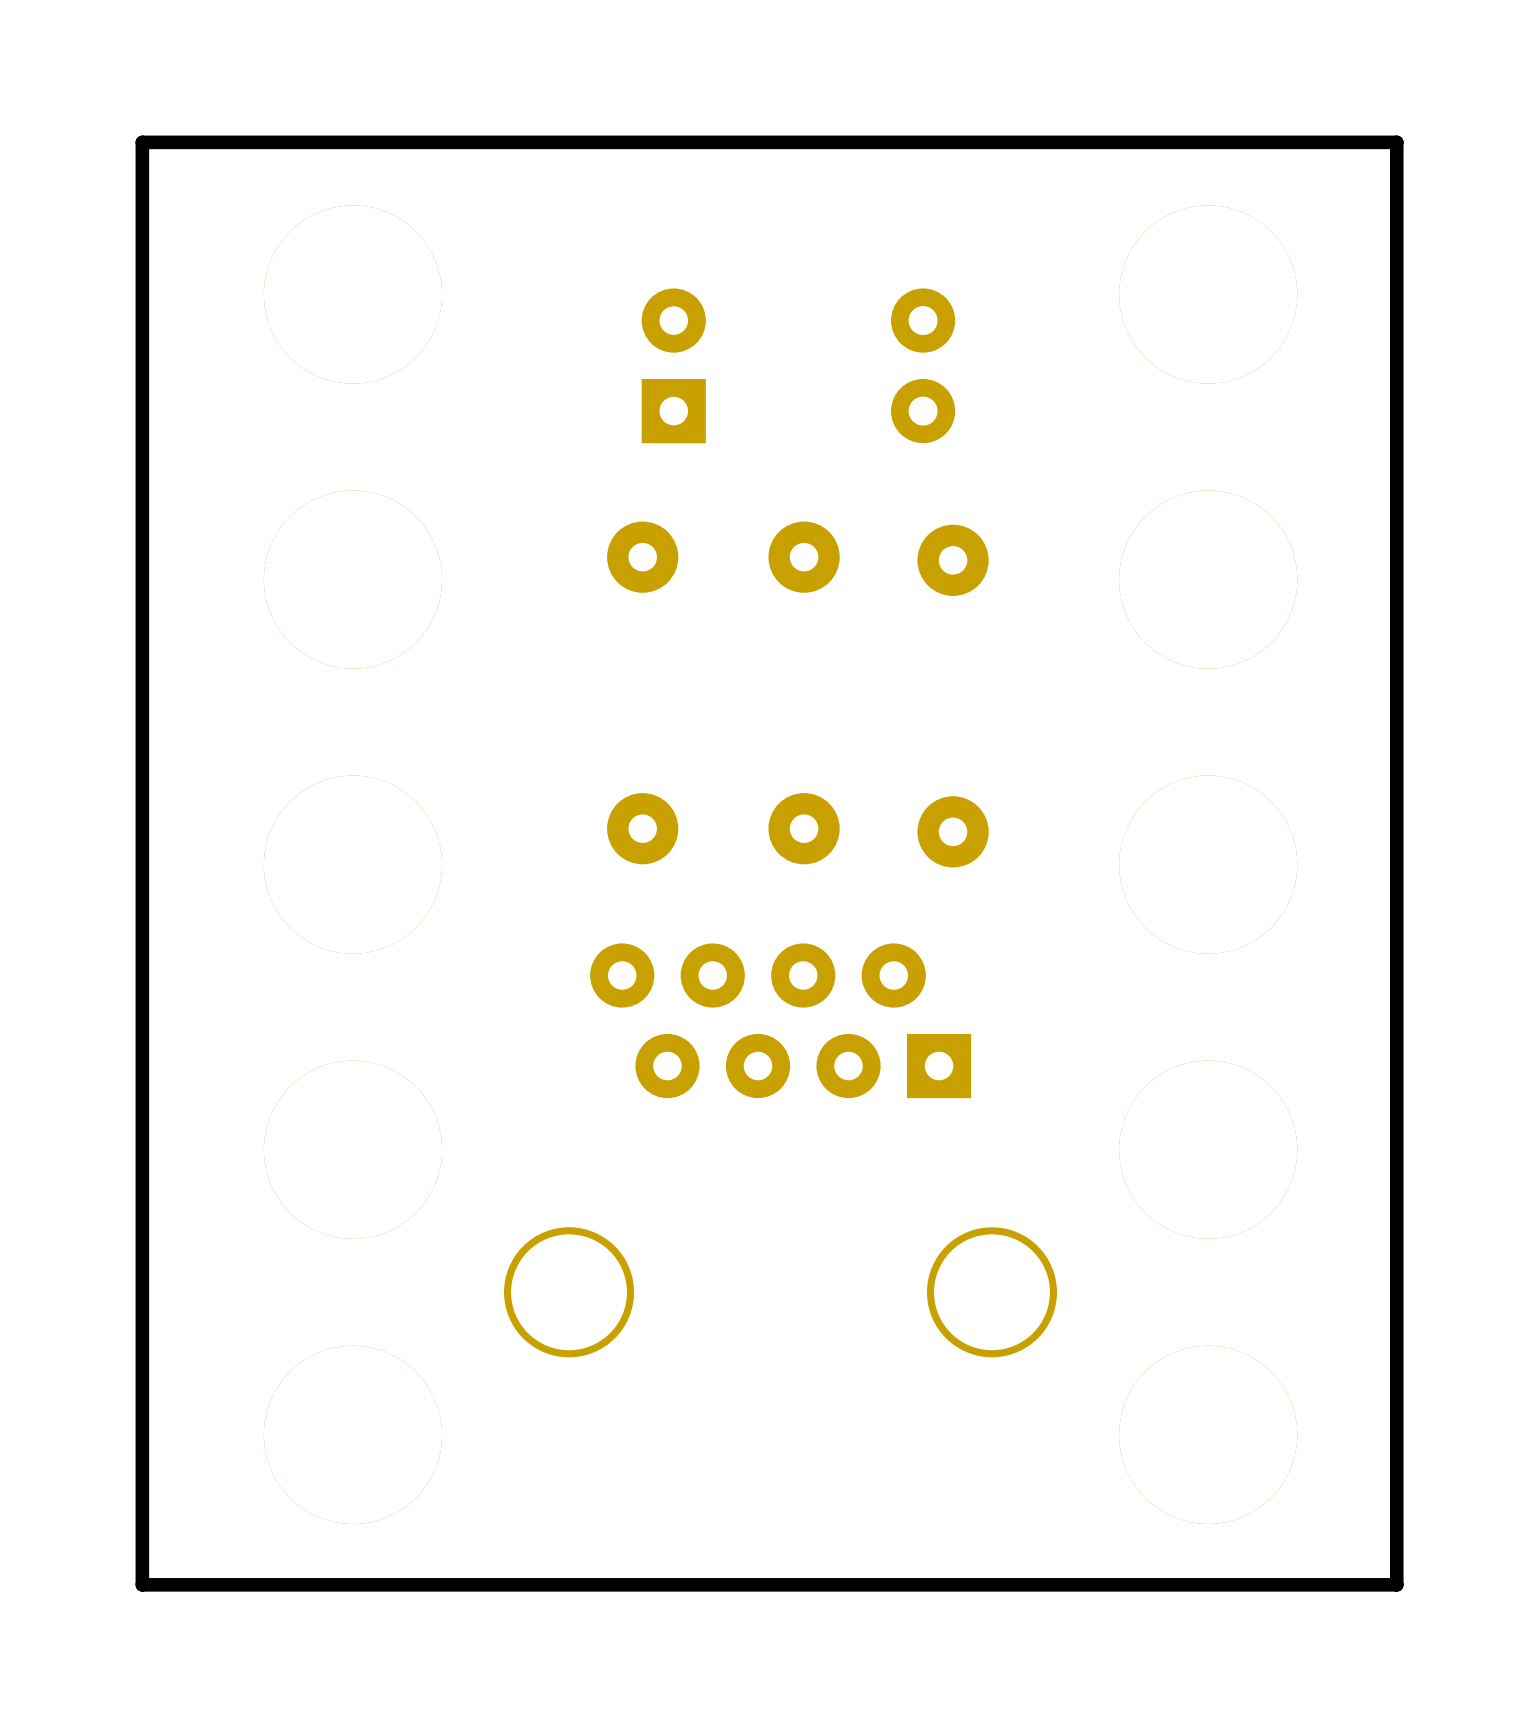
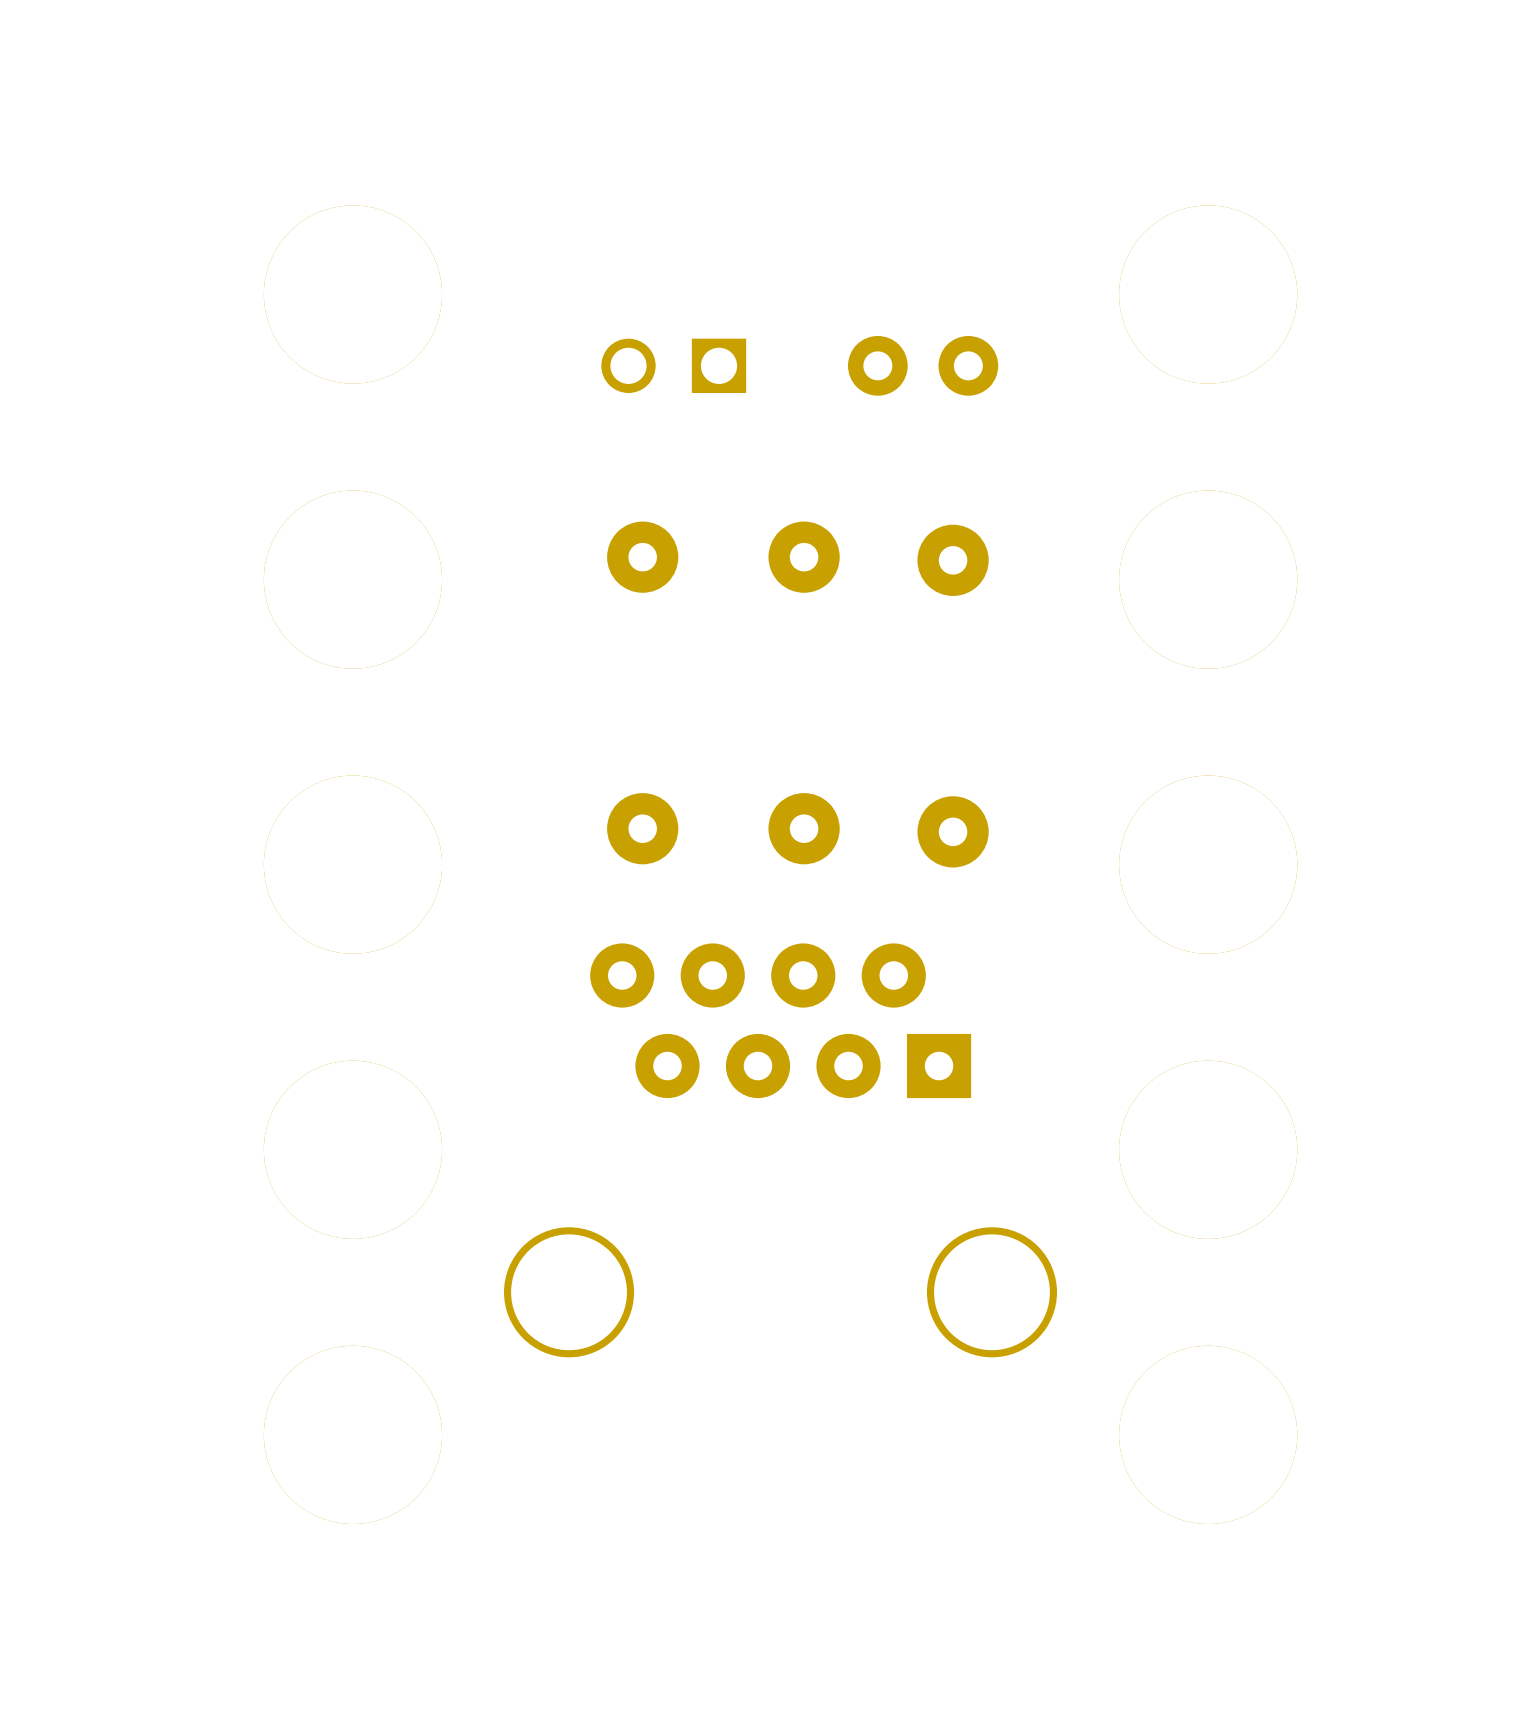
board edge: (1396, 142) (1396, 1584) (142, 1584) (142, 142) (1396, 142) -> none
part footprint: [641, 288, 706, 444] -> [601, 338, 747, 394]
part footprint: [891, 288, 956, 444] -> [847, 335, 999, 396]

